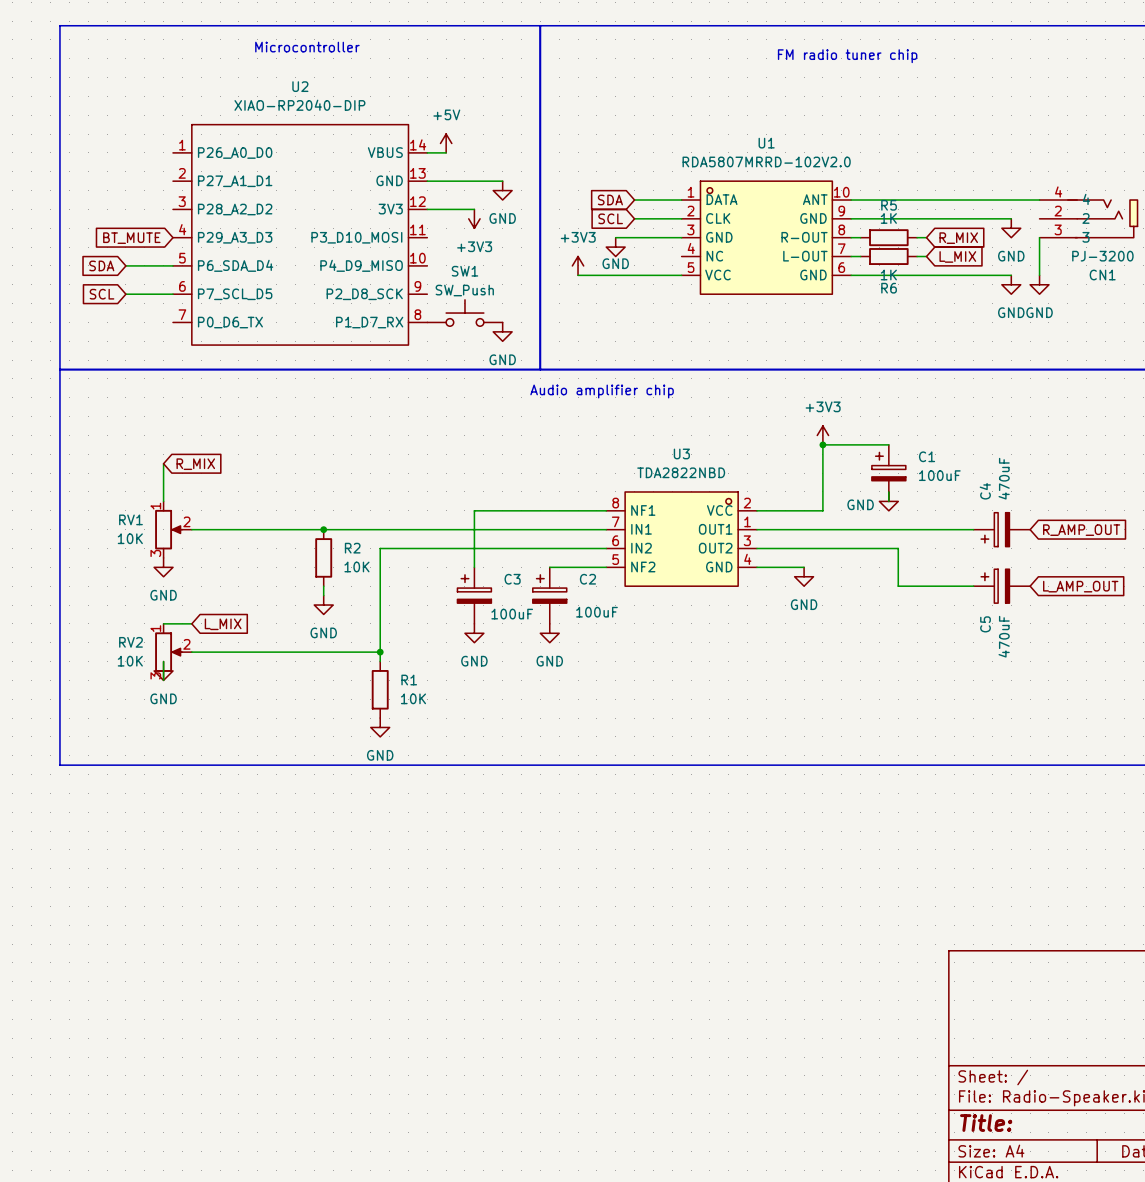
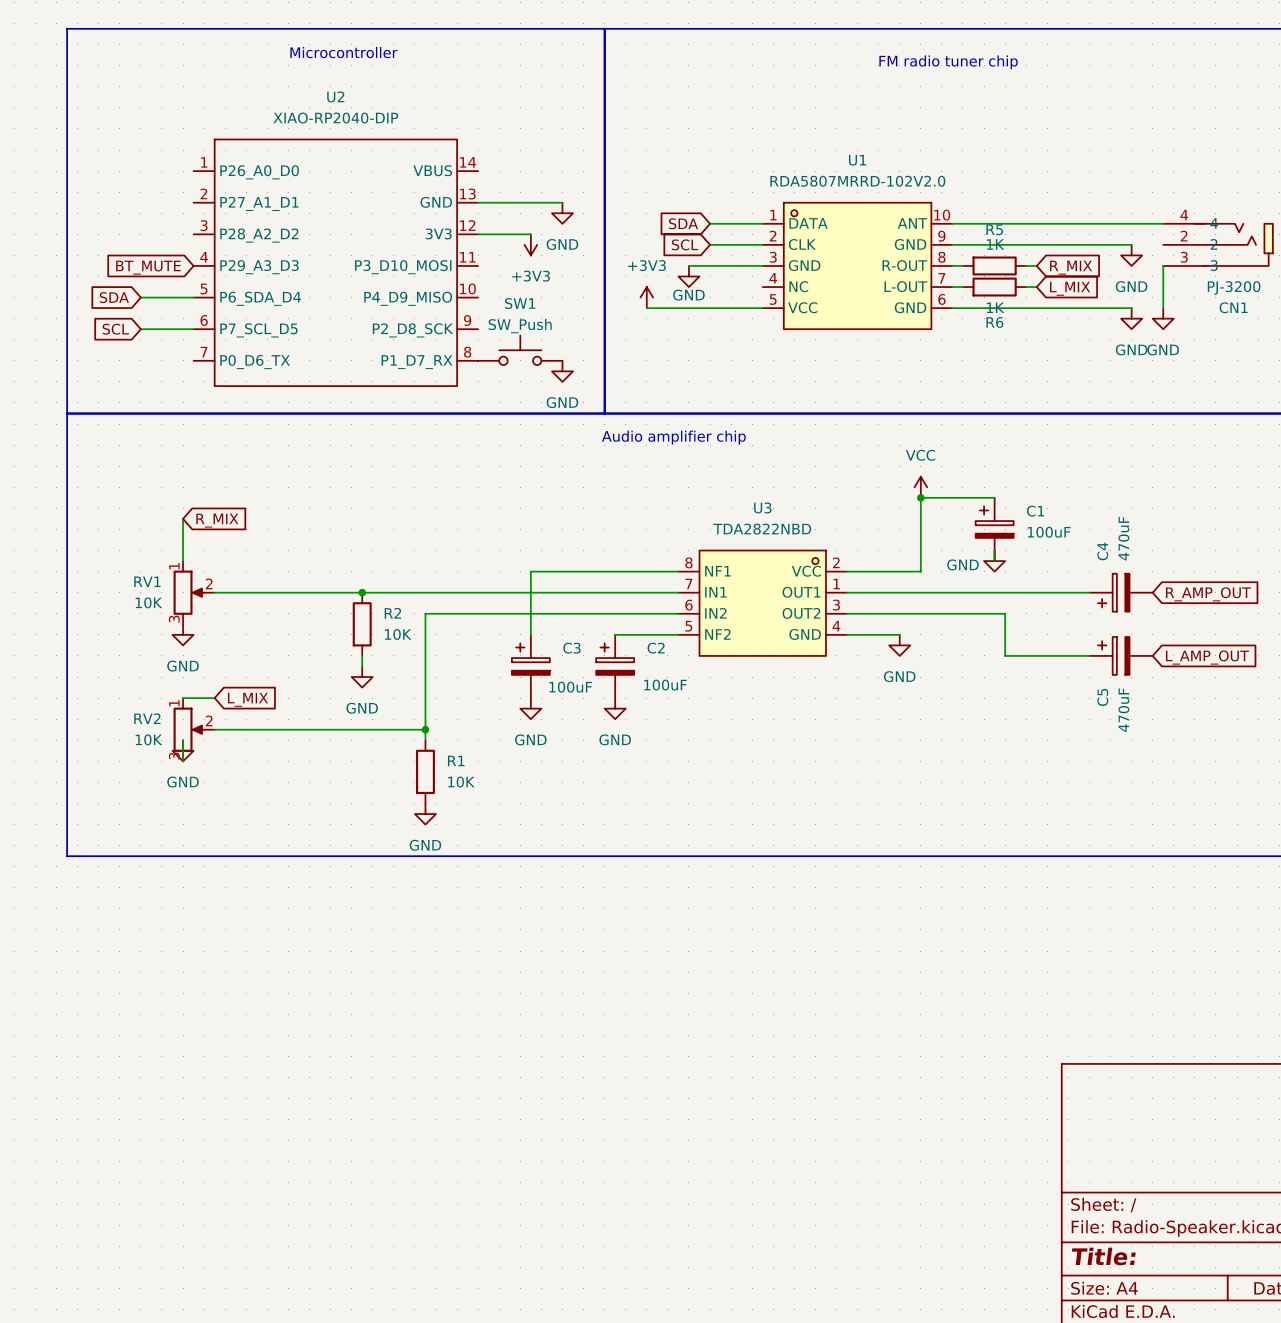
power symbol: +5V (446, 143) -> none
wire: (427, 152) (446, 152) -> none
power symbol: +3V3 (822, 435) -> VCC (920, 487)

